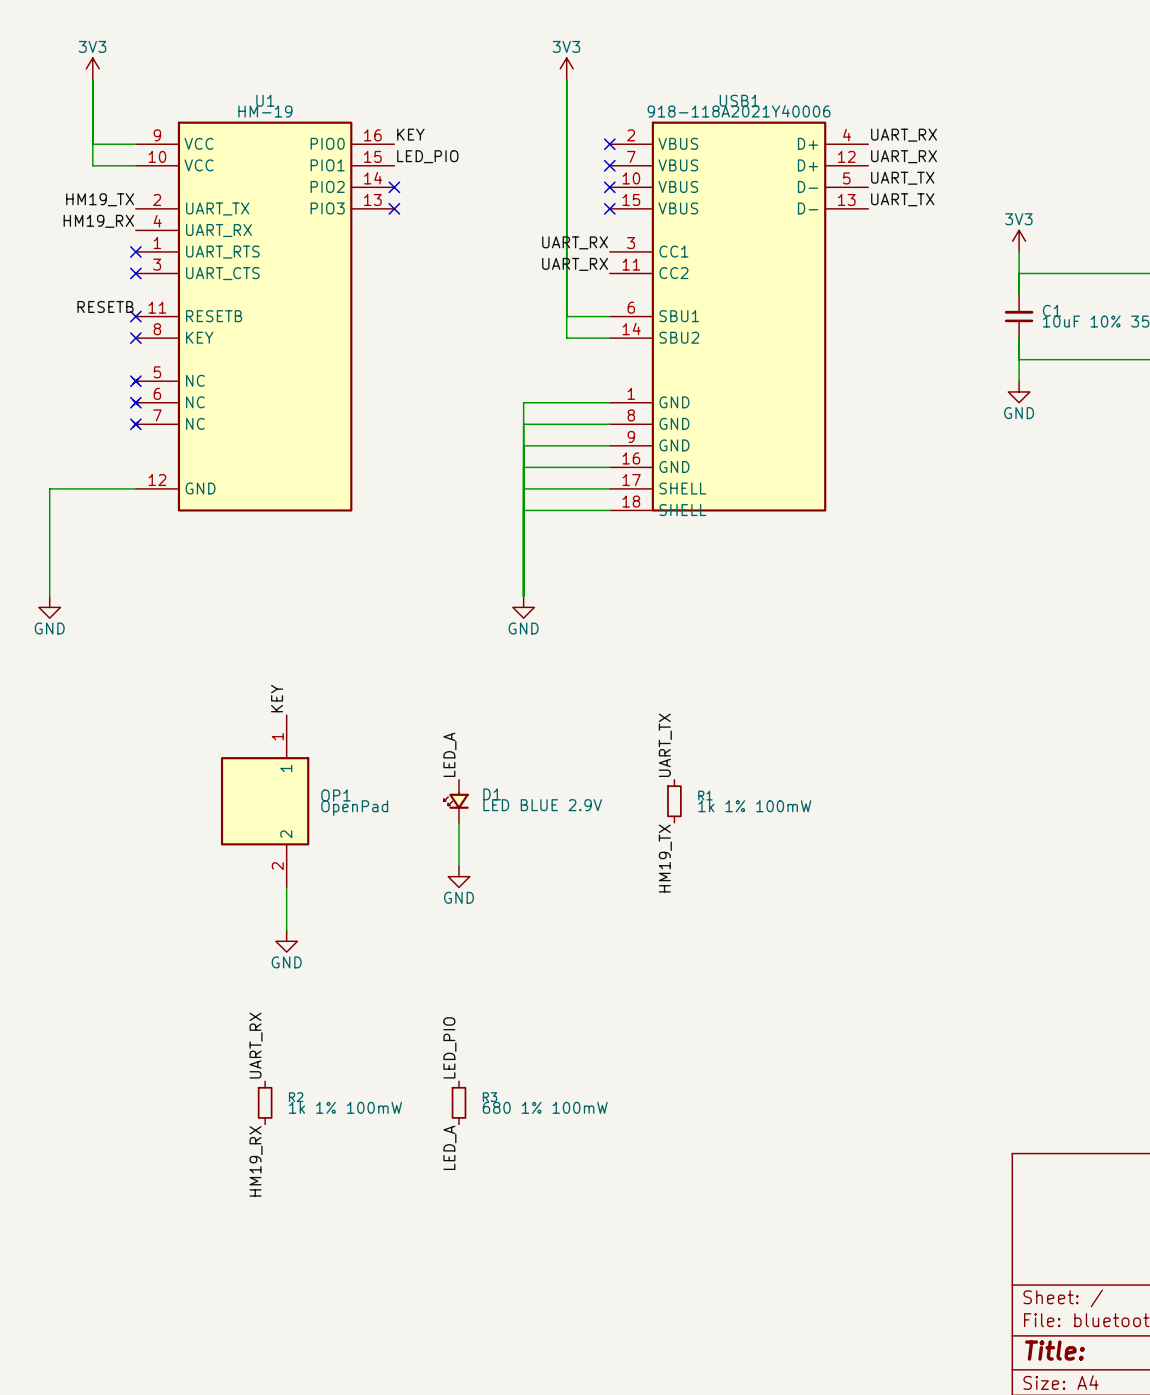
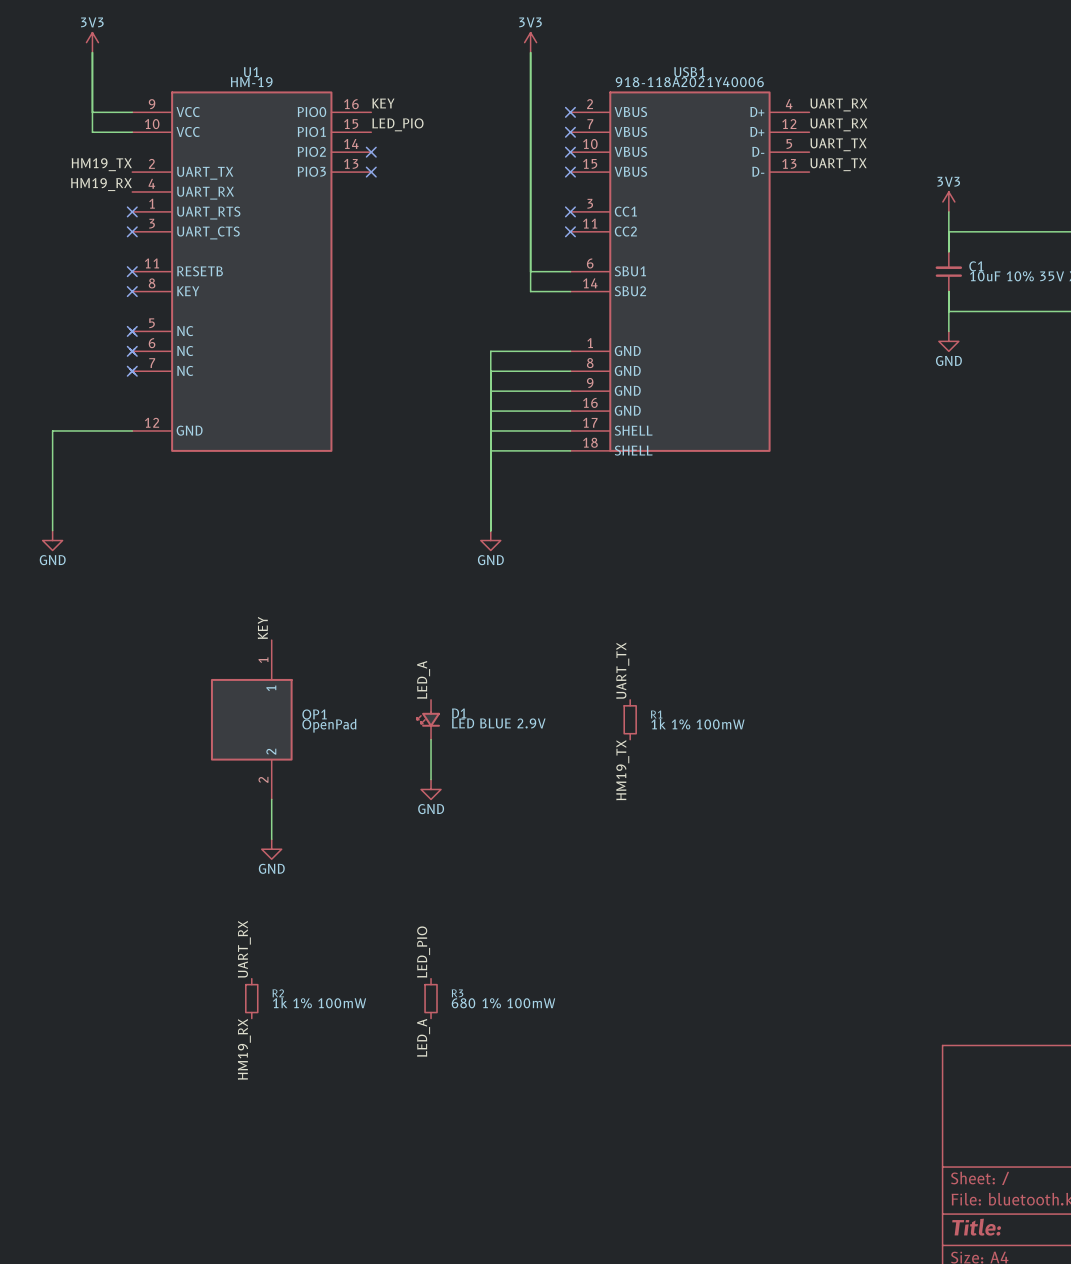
label: UART_RX (575, 242) -> none
no-connect mark: none -> (570, 211)
label: UART_RX (575, 264) -> none
no-connect mark: none -> (570, 231)
label: RESETB (105, 306) -> none

